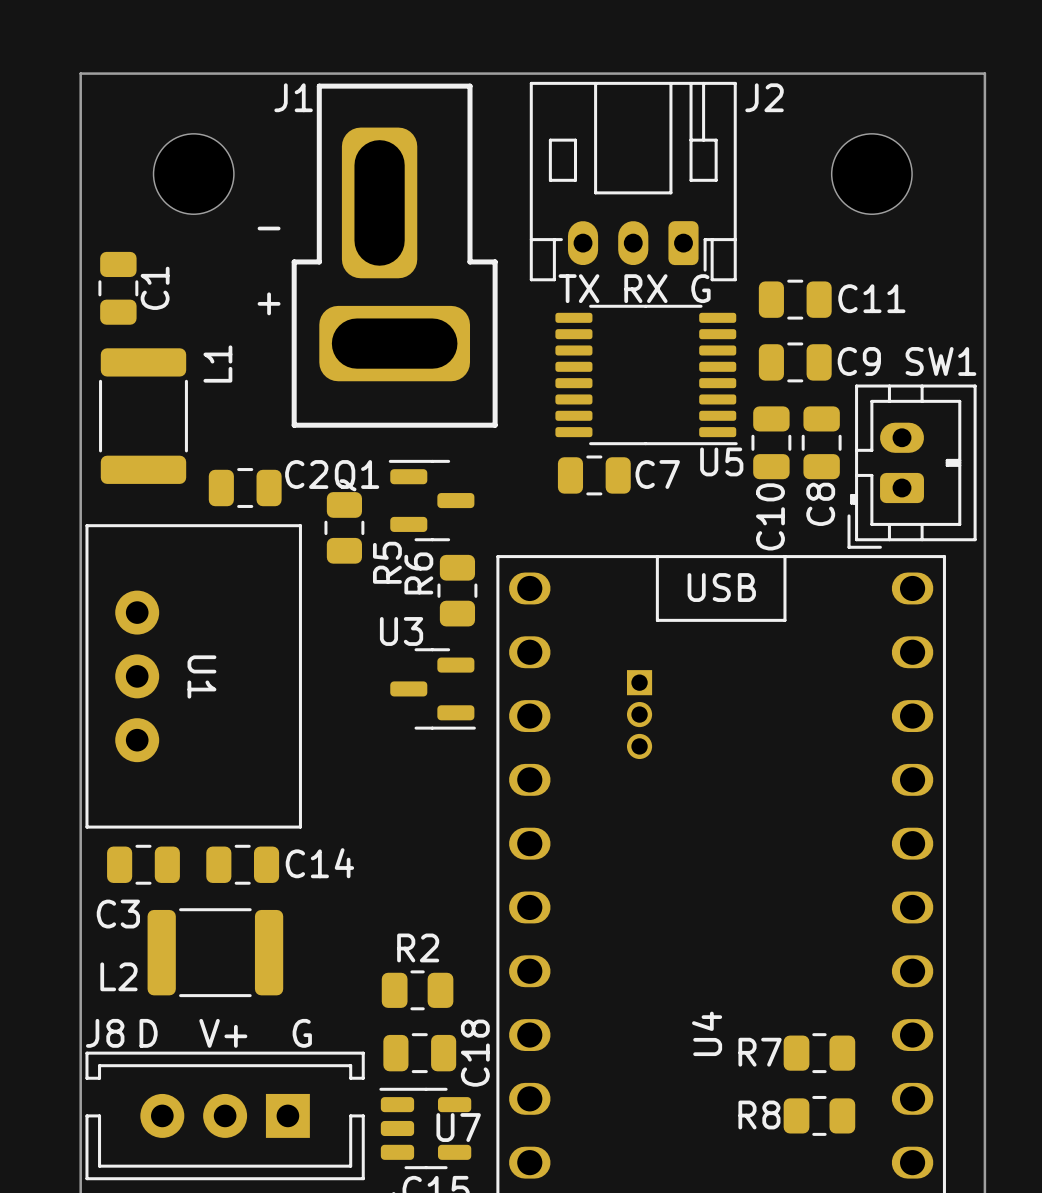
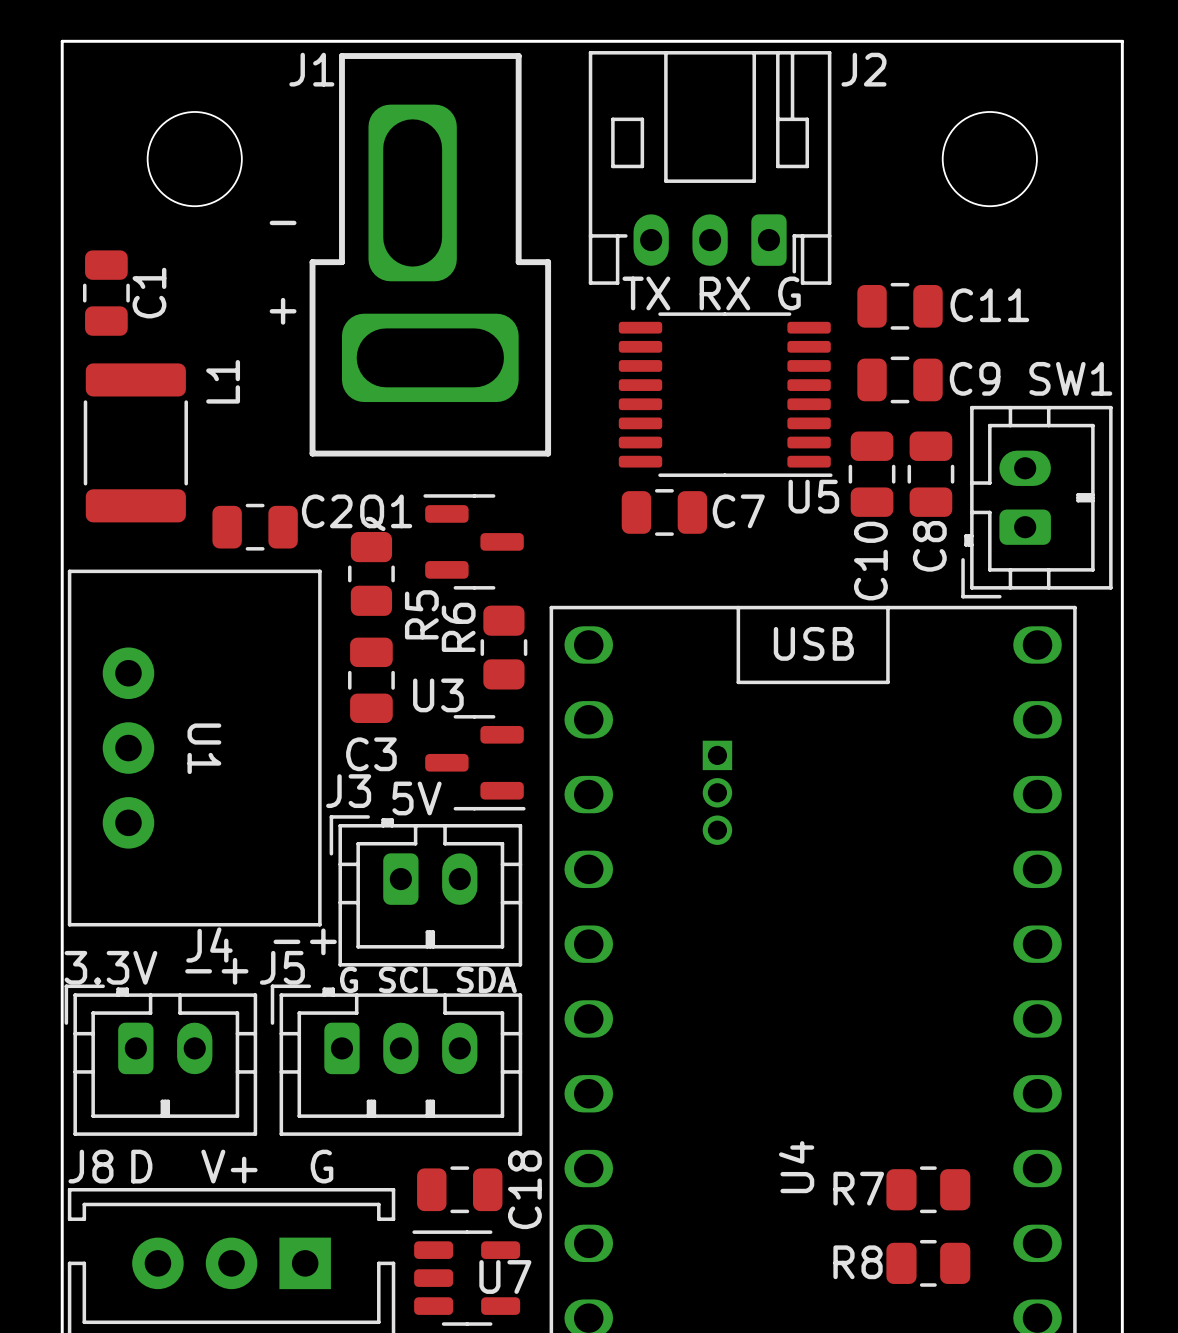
text: none -> 5V (417, 798)
J3: none -> (425, 890)
text: none -> -+ (305, 941)
text: none -> 3.3V -+ (156, 967)
C3 rotation: 0° (143, 864) -> 90° clockwise (371, 680)
C3 position: (143, 864) -> (371, 680)
C14: (242, 864) -> none
text: none -> G SCL SDA (428, 979)
J4: none -> (160, 1060)
J5: none -> (396, 1060)
L2: (215, 952) -> none
R2: (417, 990) -> none

